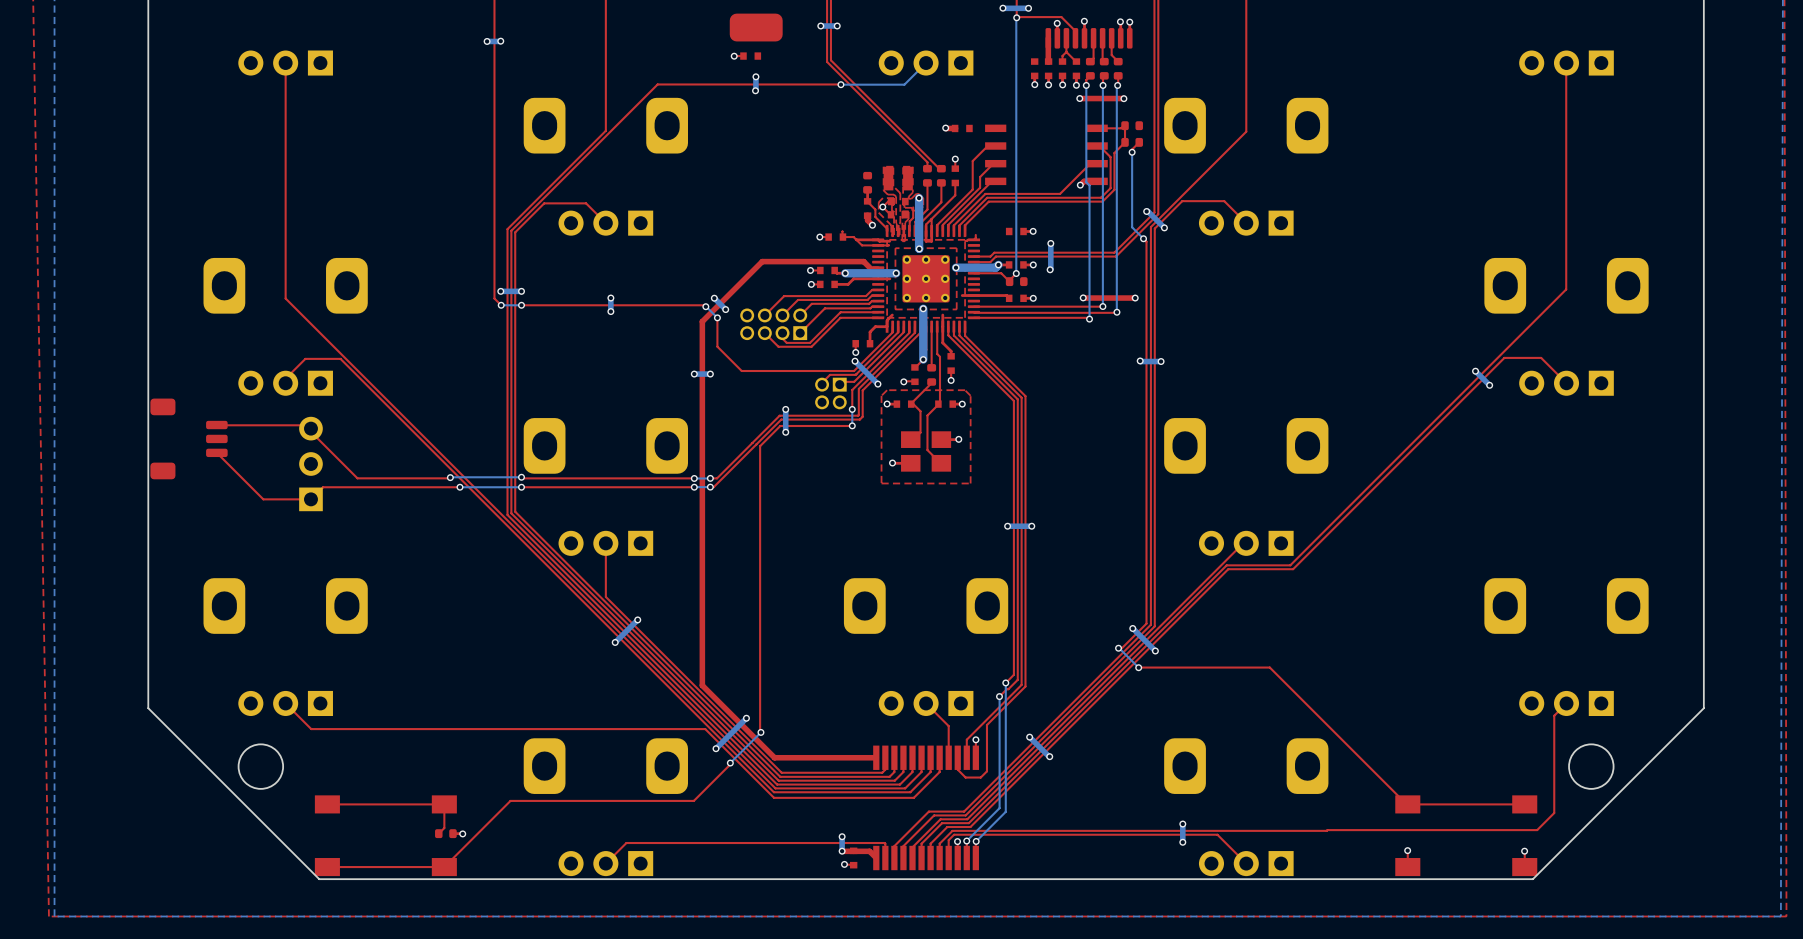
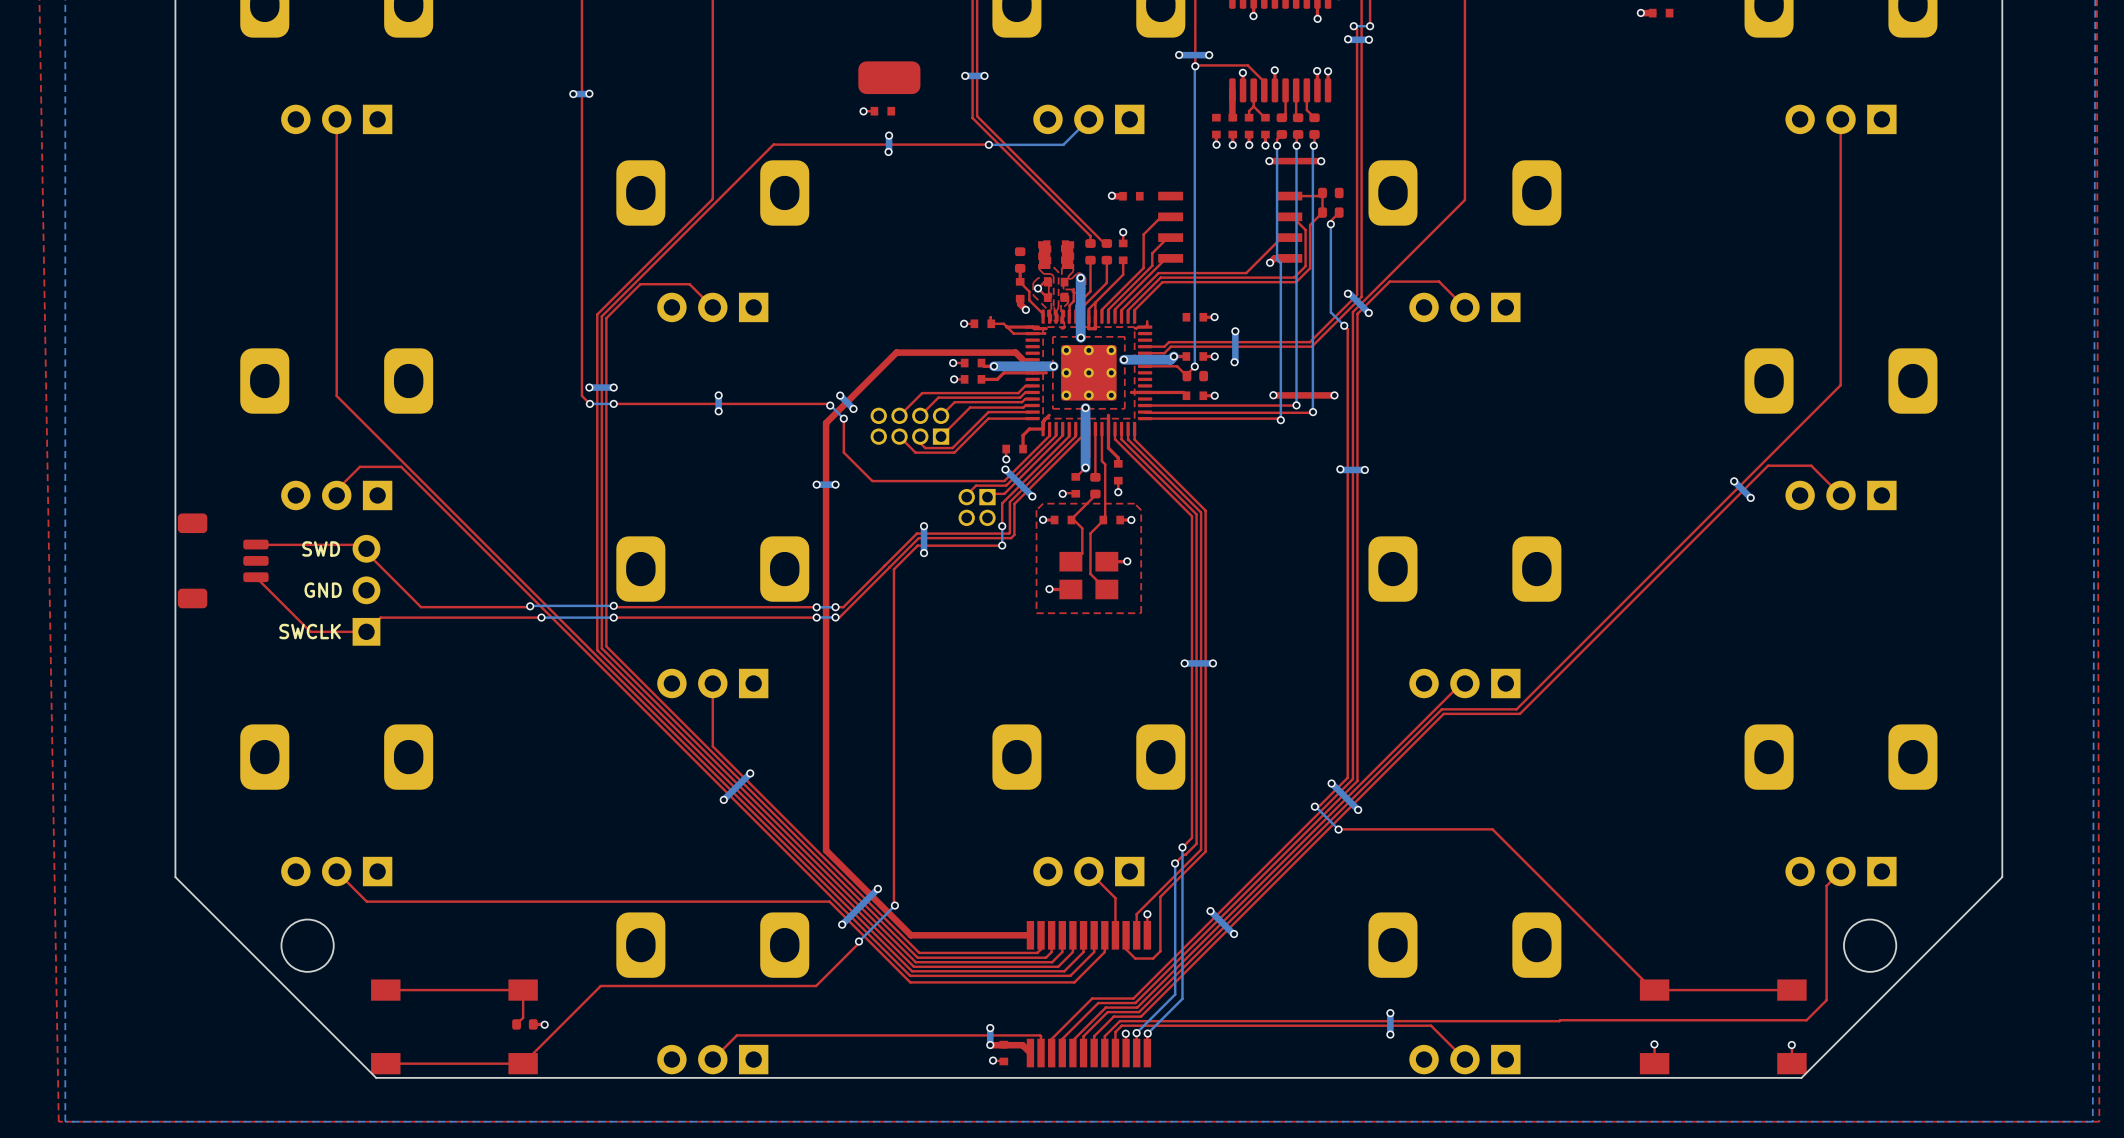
text: none -> SWD (321, 548)
text: none -> GND (323, 590)
text: none -> SWCLK (310, 631)

